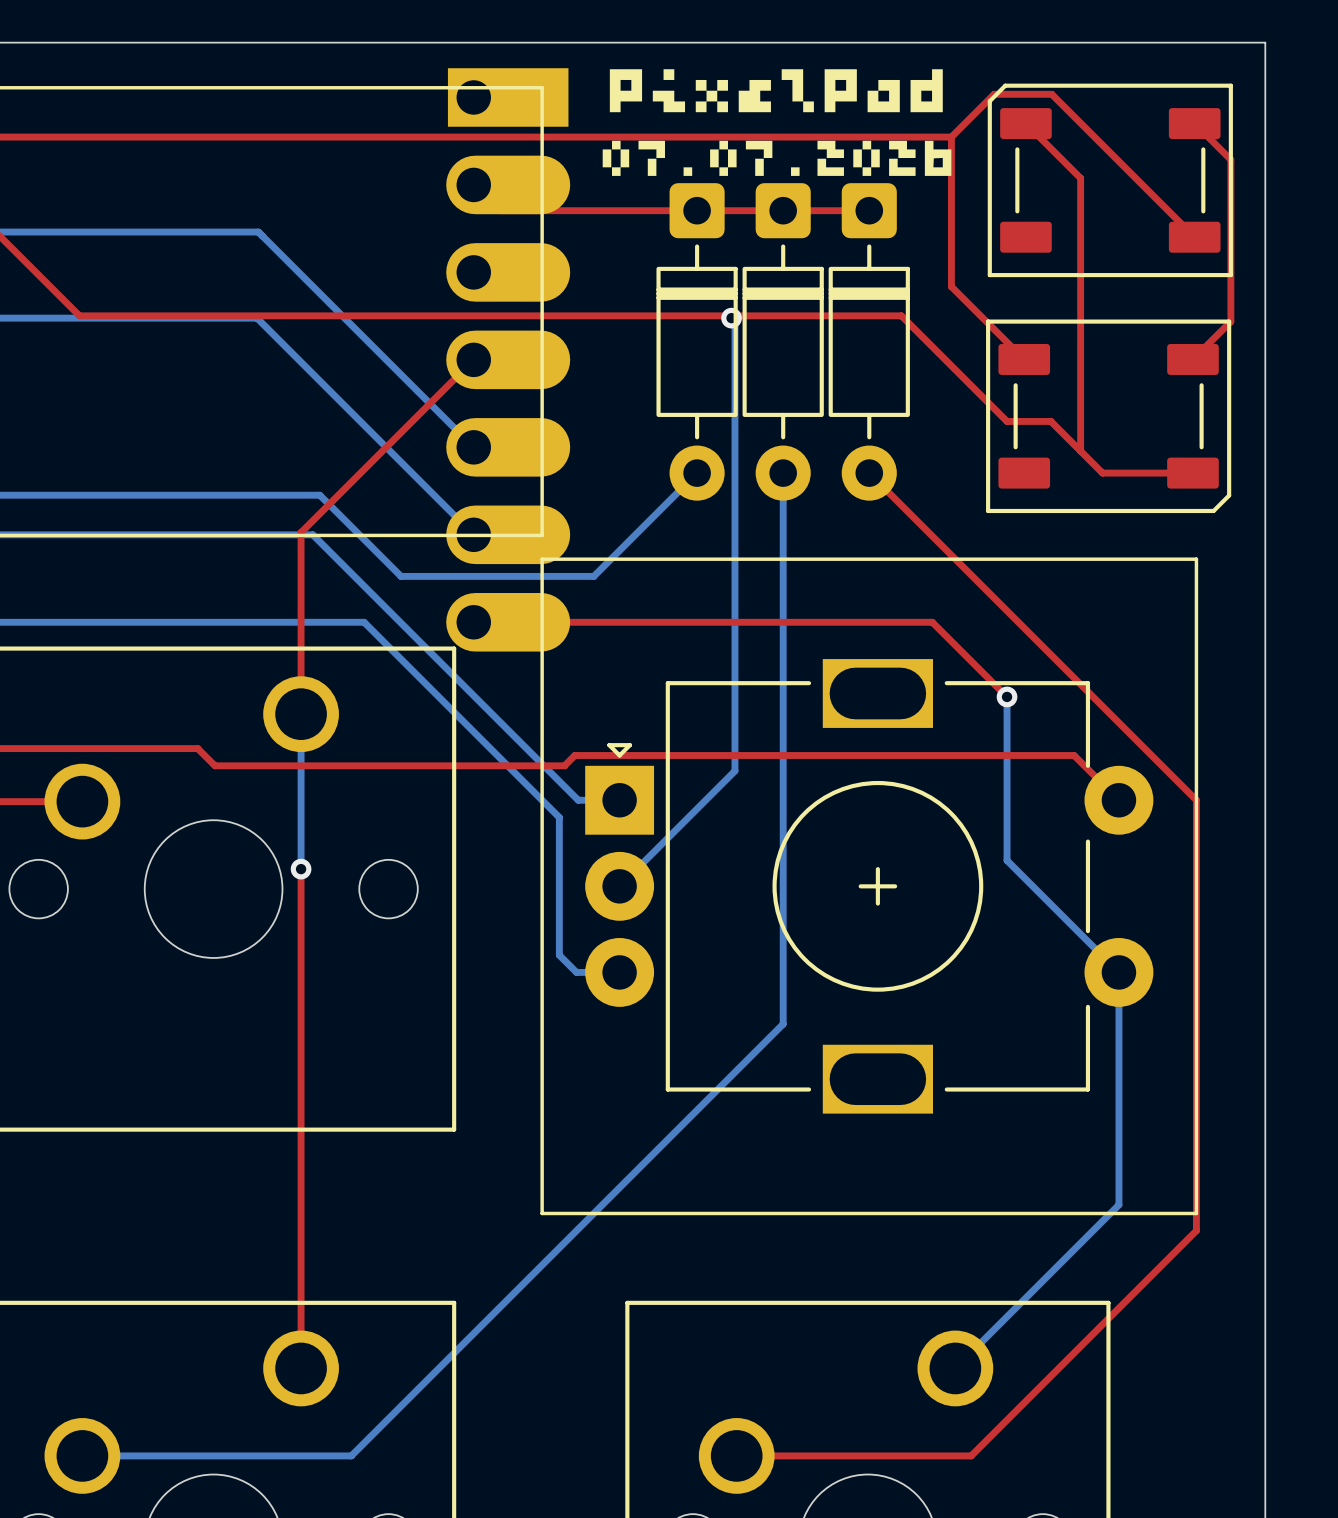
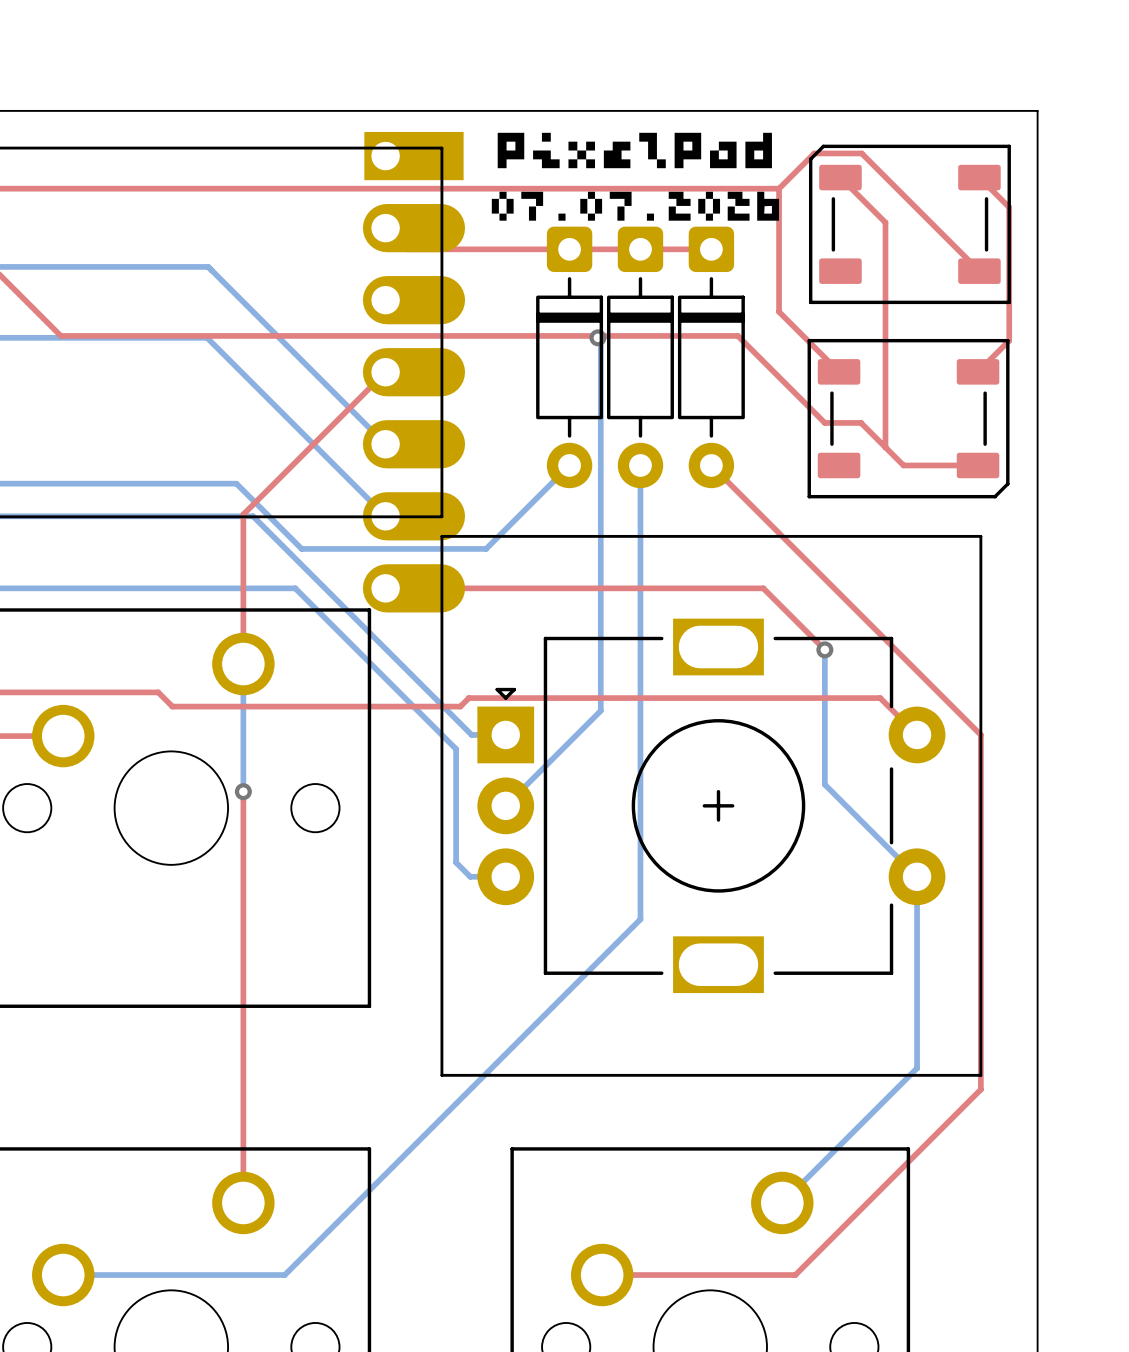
bottom track: (292, 495) (319, 495) (401, 576) (593, 576) (595, 574) -> (236, 483) (301, 548) (486, 548)

